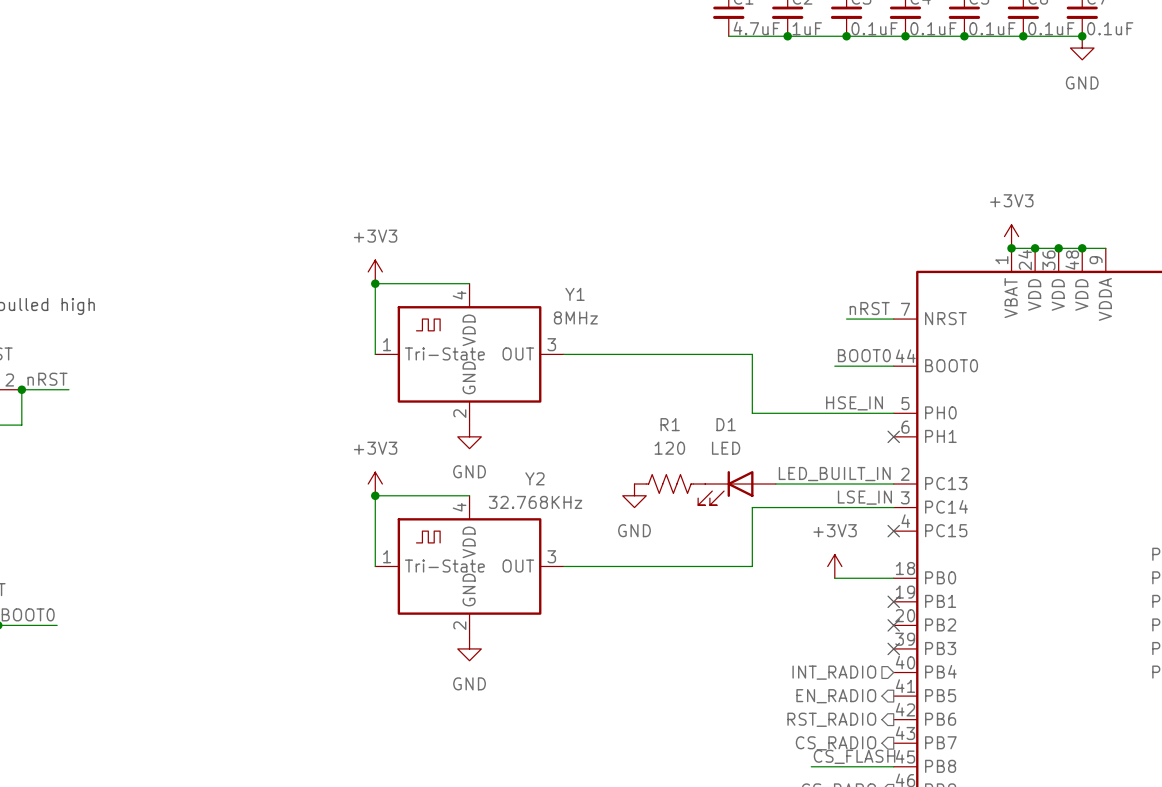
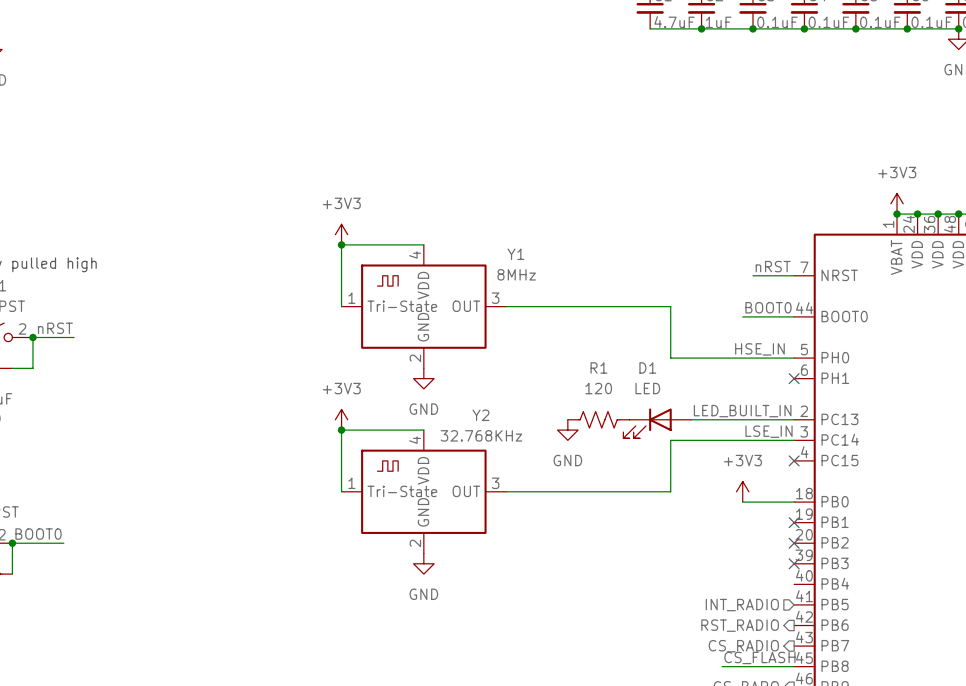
hierarchical label: INT_RADIO (834, 672) -> none
hierarchical label shape: output (836, 696) -> input (742, 605)
hierarchical label: EN_RADIO (836, 696) -> INT_RADIO (742, 605)

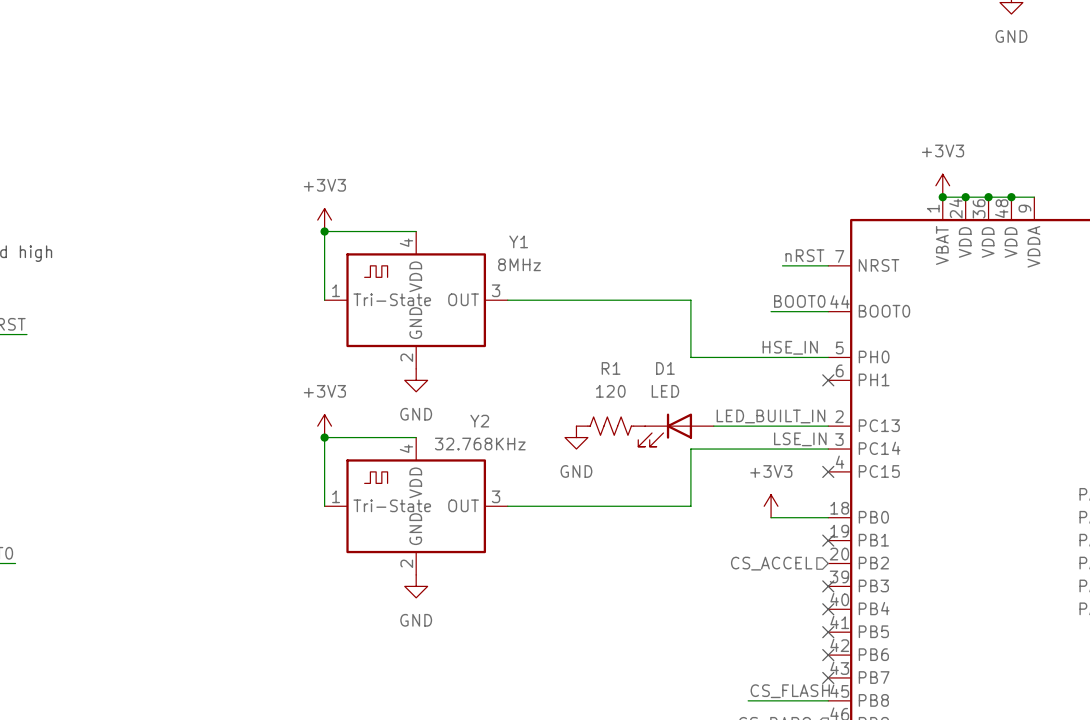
hierarchical label: none -> CS_ACCEL (771, 563)
no-connect mark: (794, 543) -> none
no-connect mark: none -> (828, 609)
no-connect mark: none -> (828, 632)
hierarchical label: INT_RADIO (742, 605) -> none
hierarchical label: RST_RADIO (740, 625) -> none
no-connect mark: none -> (828, 655)
hierarchical label: CS_RADIO (743, 646) -> none
no-connect mark: none -> (828, 677)

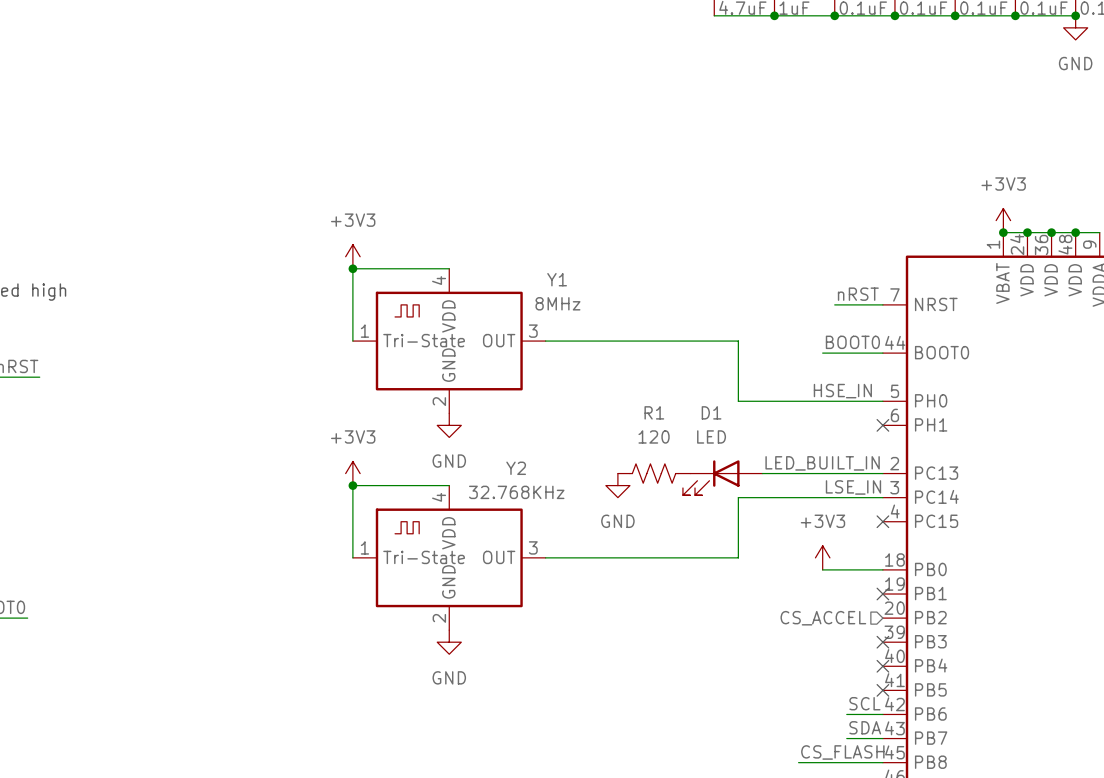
label: none -> SCL (864, 703)
wire: none -> (846, 714) (882, 714)
no-connect mark: (828, 655) -> none
label: none -> SDA (865, 727)
wire: none -> (846, 738) (882, 738)
no-connect mark: (828, 677) -> none

